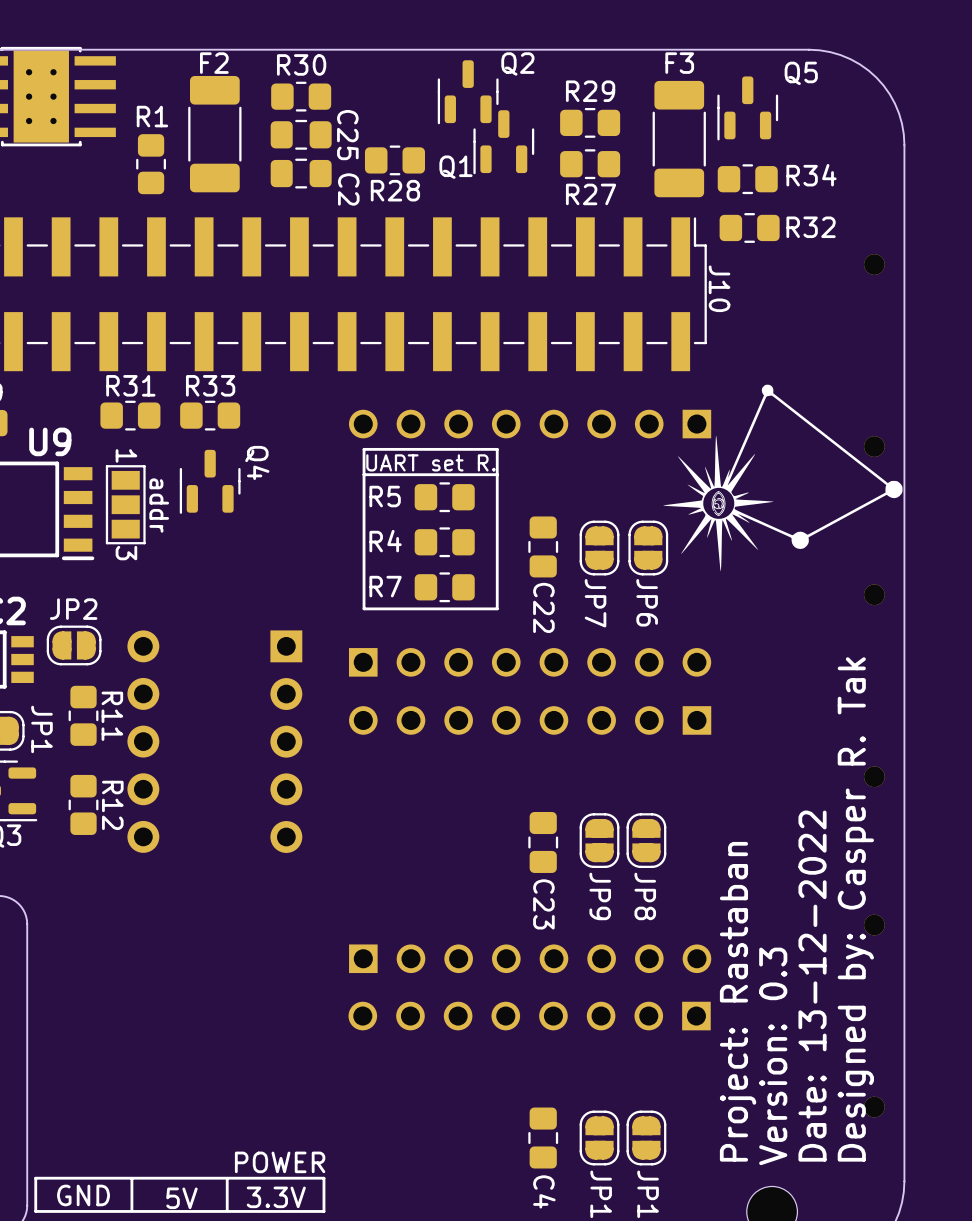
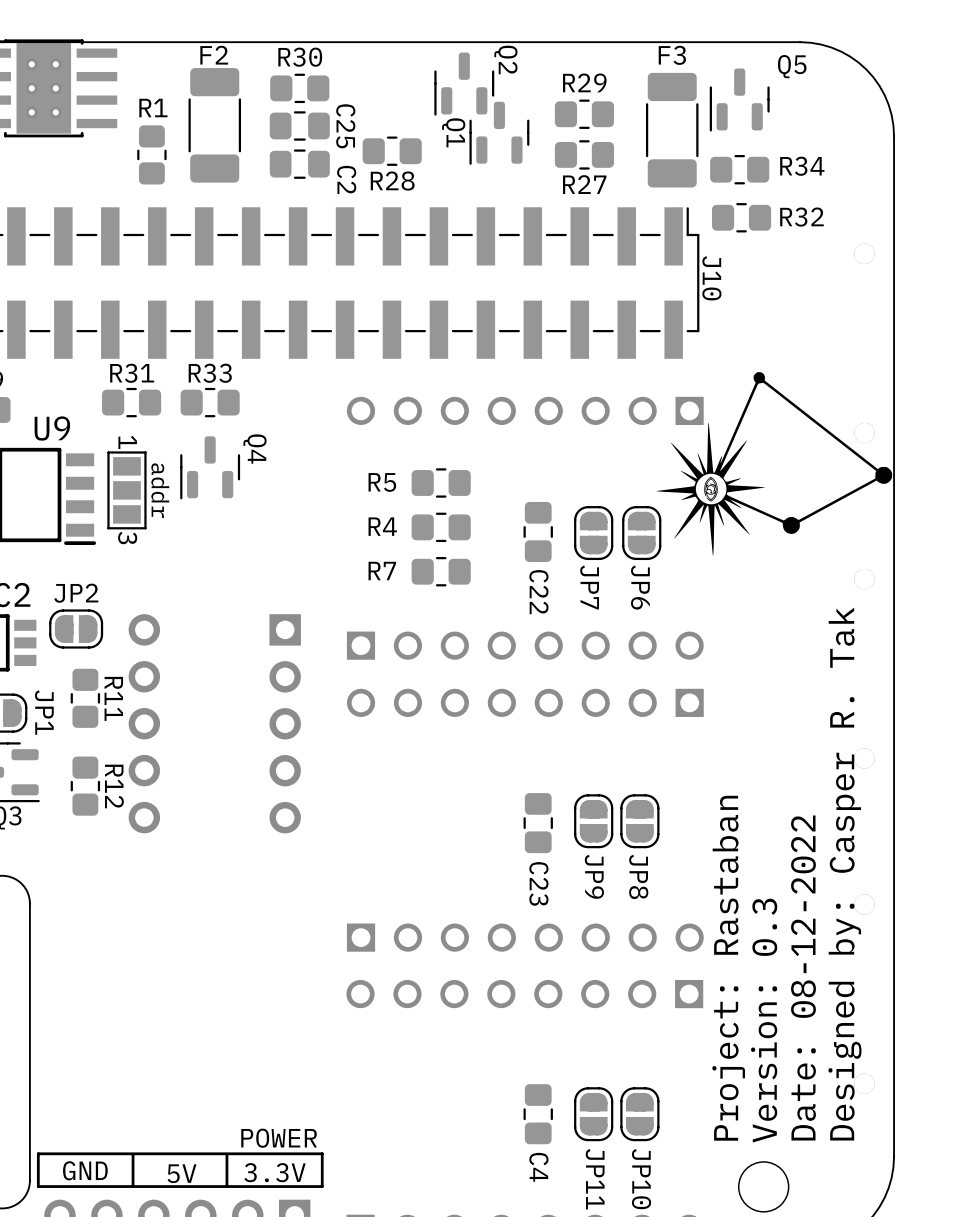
Q2 name rotation: 0° (517, 63) -> 90° clockwise (505, 59)
Q1 name rotation: 0° (455, 167) -> 90° clockwise (453, 132)
line: (497, 449) (497, 608) (364, 608) (364, 449) (497, 449) -> none
text: UART set R. (431, 462) -> none
line: (497, 474) (364, 474) -> none
text: Date: 13-12-2022 (812, 986) -> Date: 08-12-2022 (803, 977)

